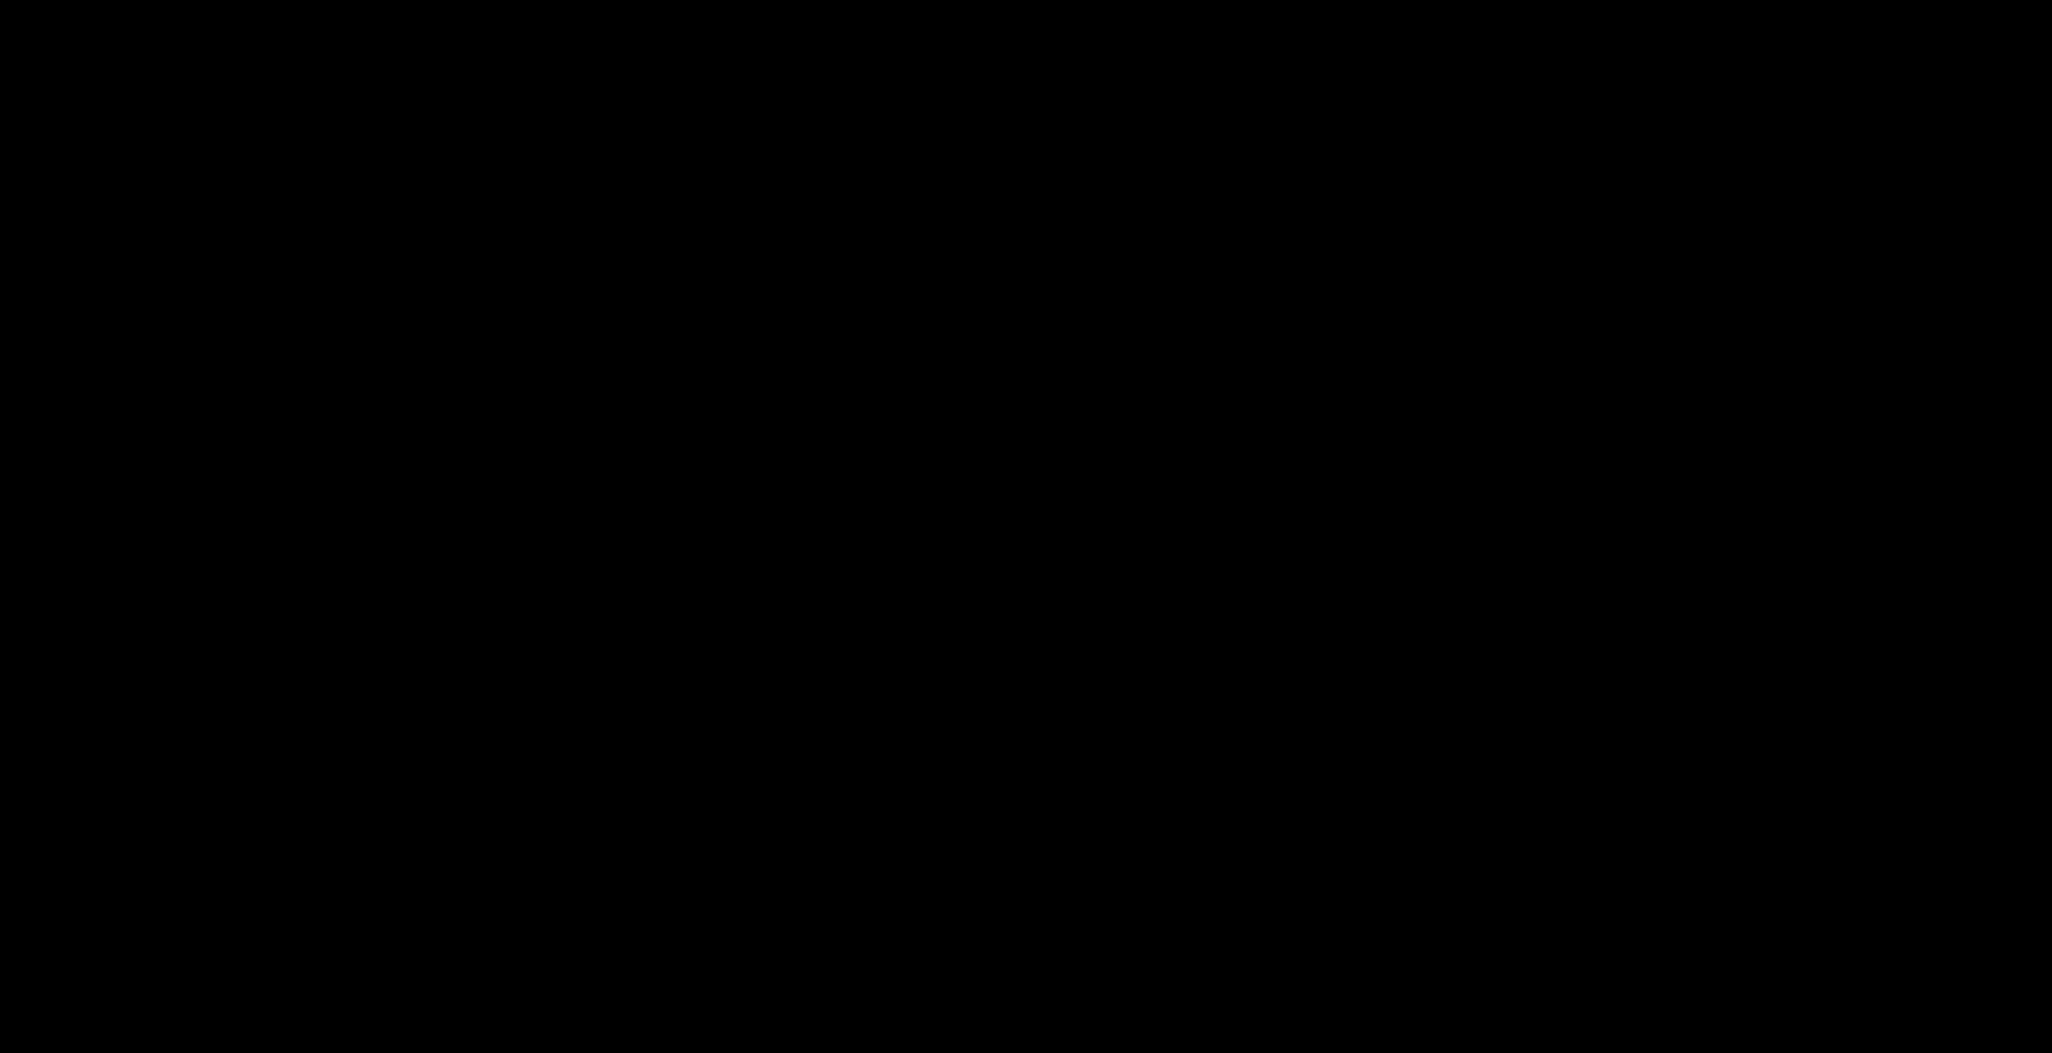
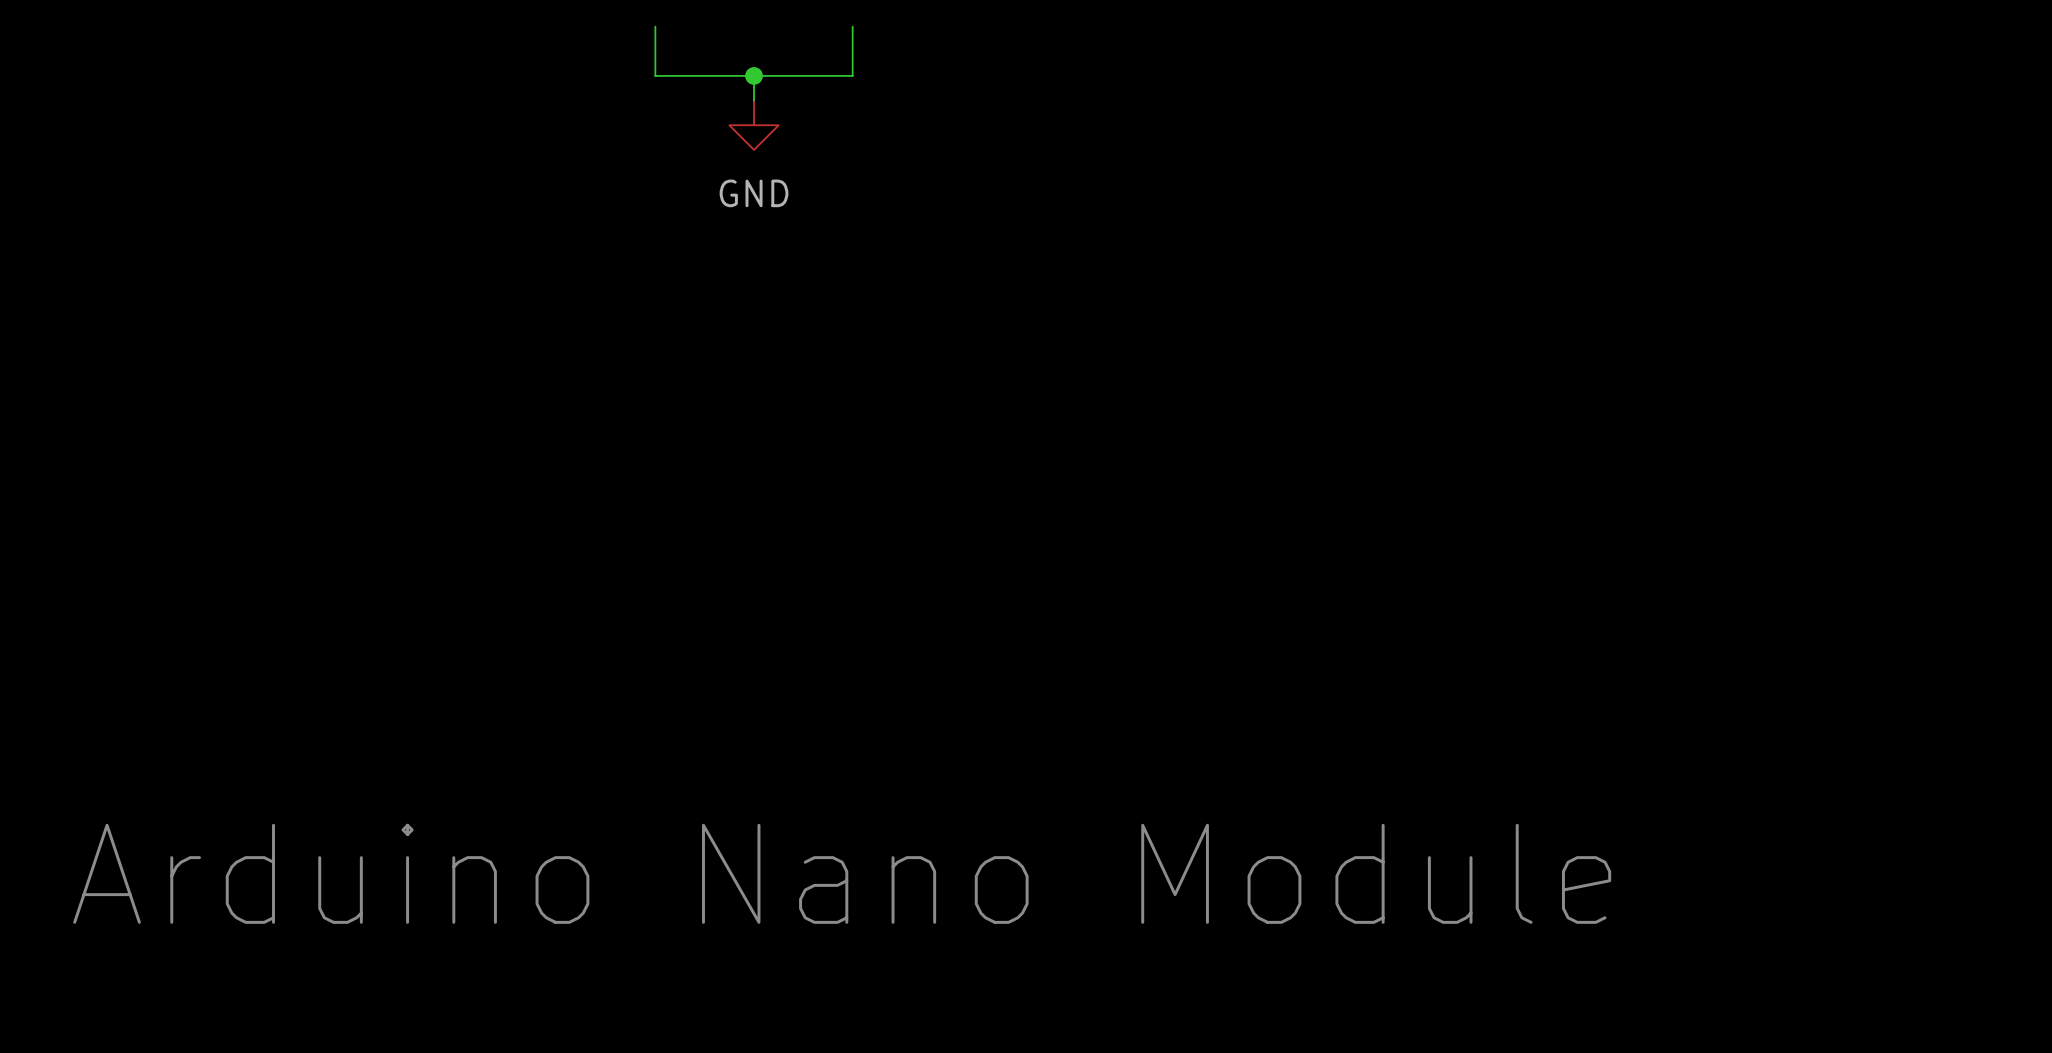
wire: none -> (655, 26) (655, 75) (852, 75) (852, 26)
wire: none -> (754, 75) (754, 100)
junction: none -> (754, 75)
power symbol: none -> GND (754, 125)
text: none -> Arduino Nano Module (842, 873)

